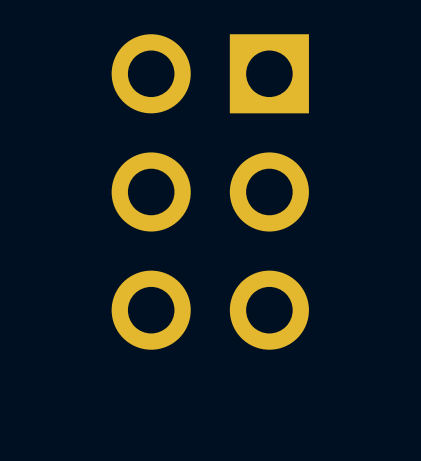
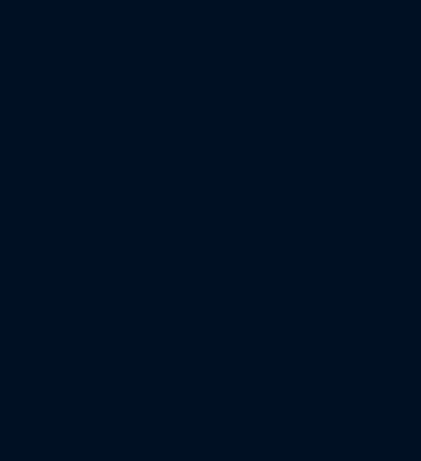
part: (210, 191) -> none

